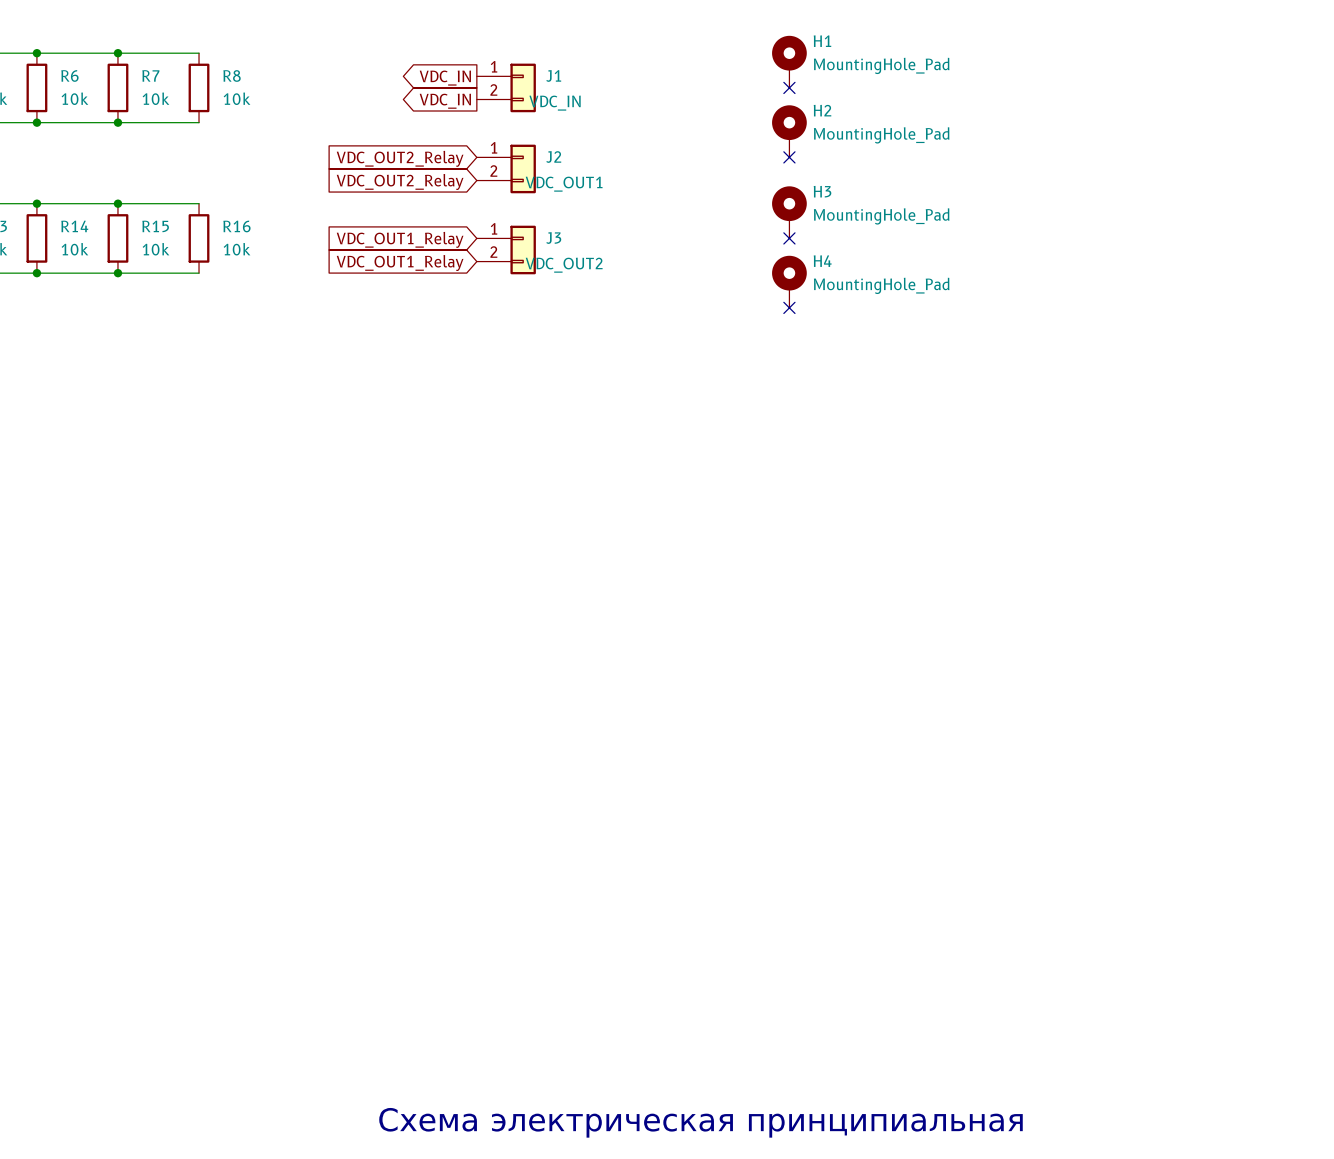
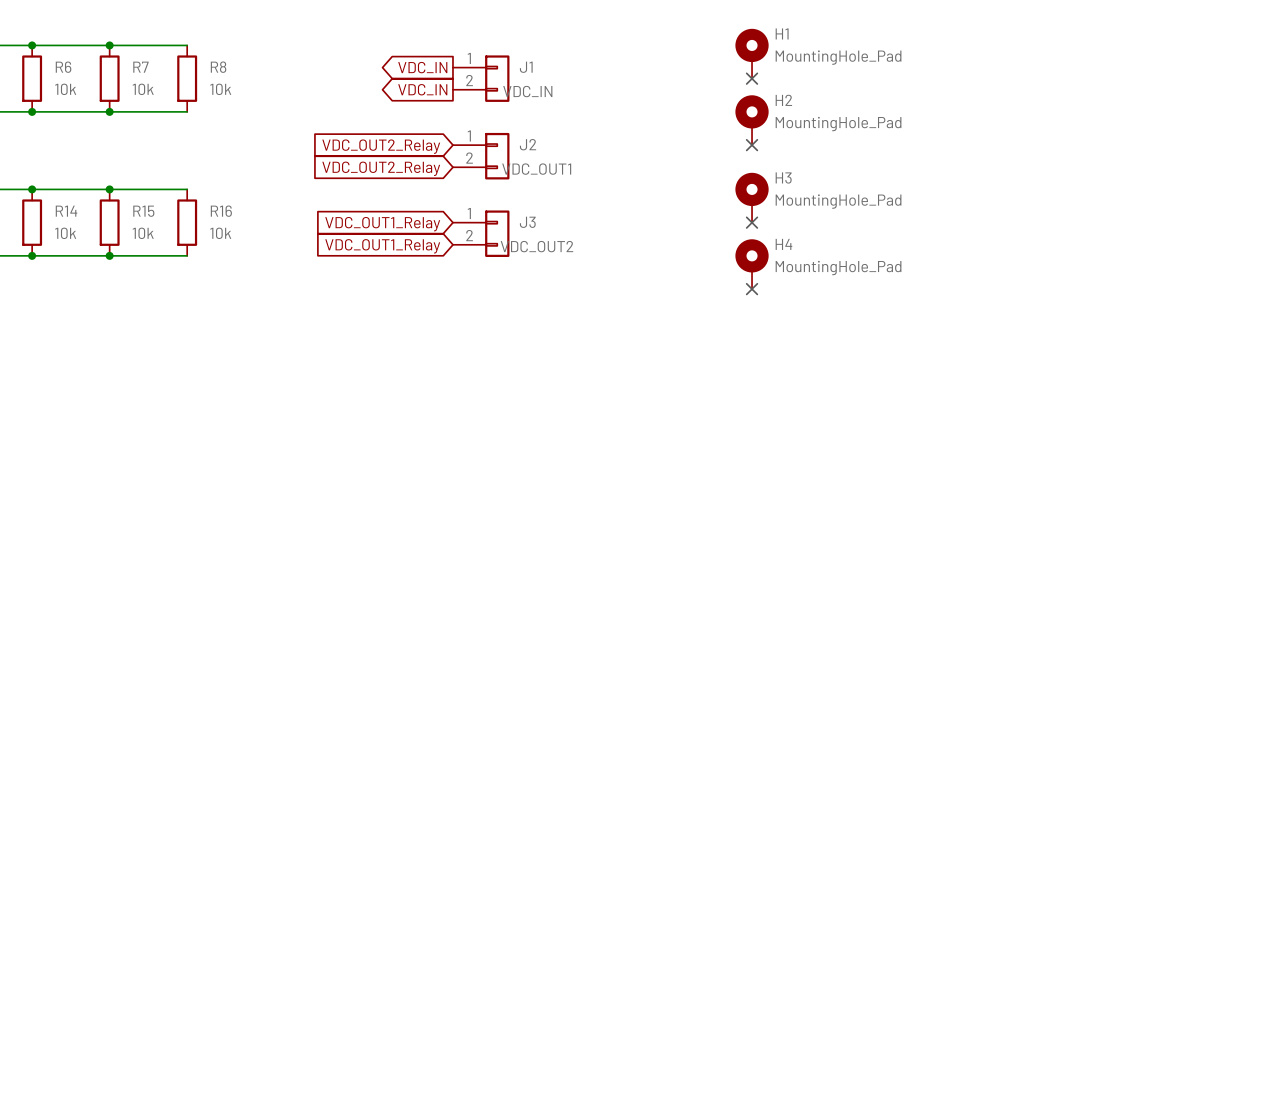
text: Схема электрическая принципиальная (700, 1122) -> none

